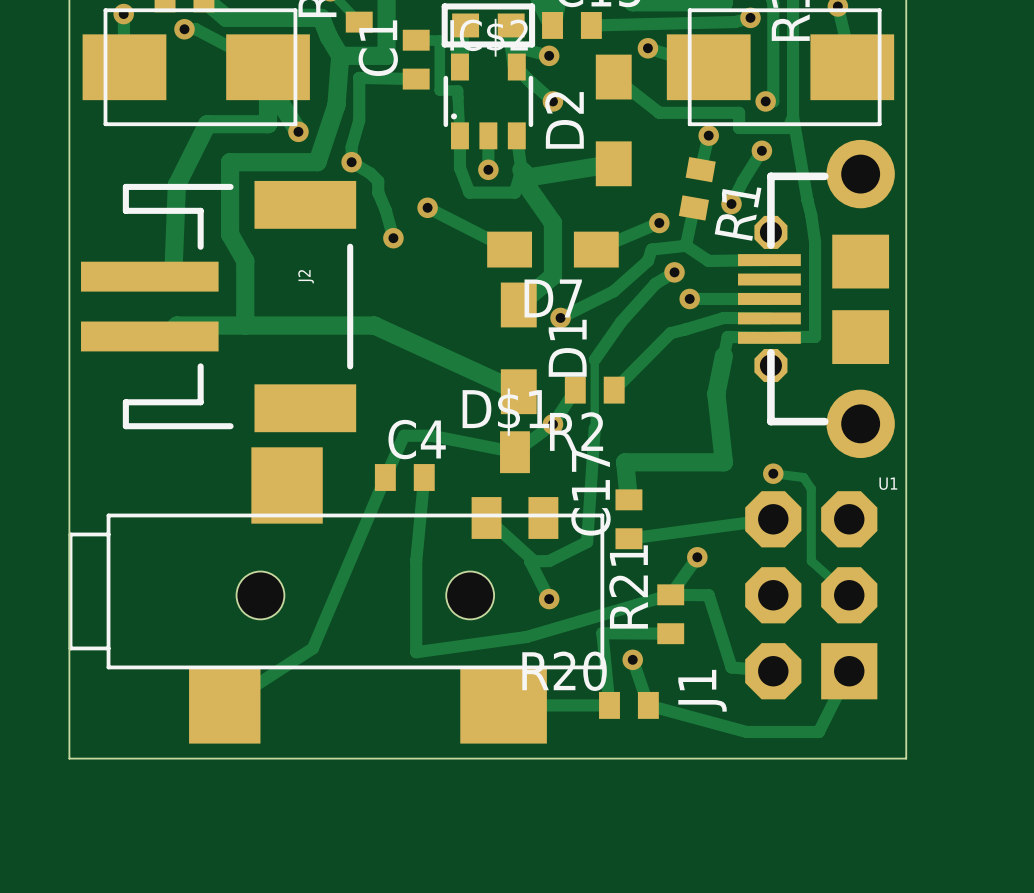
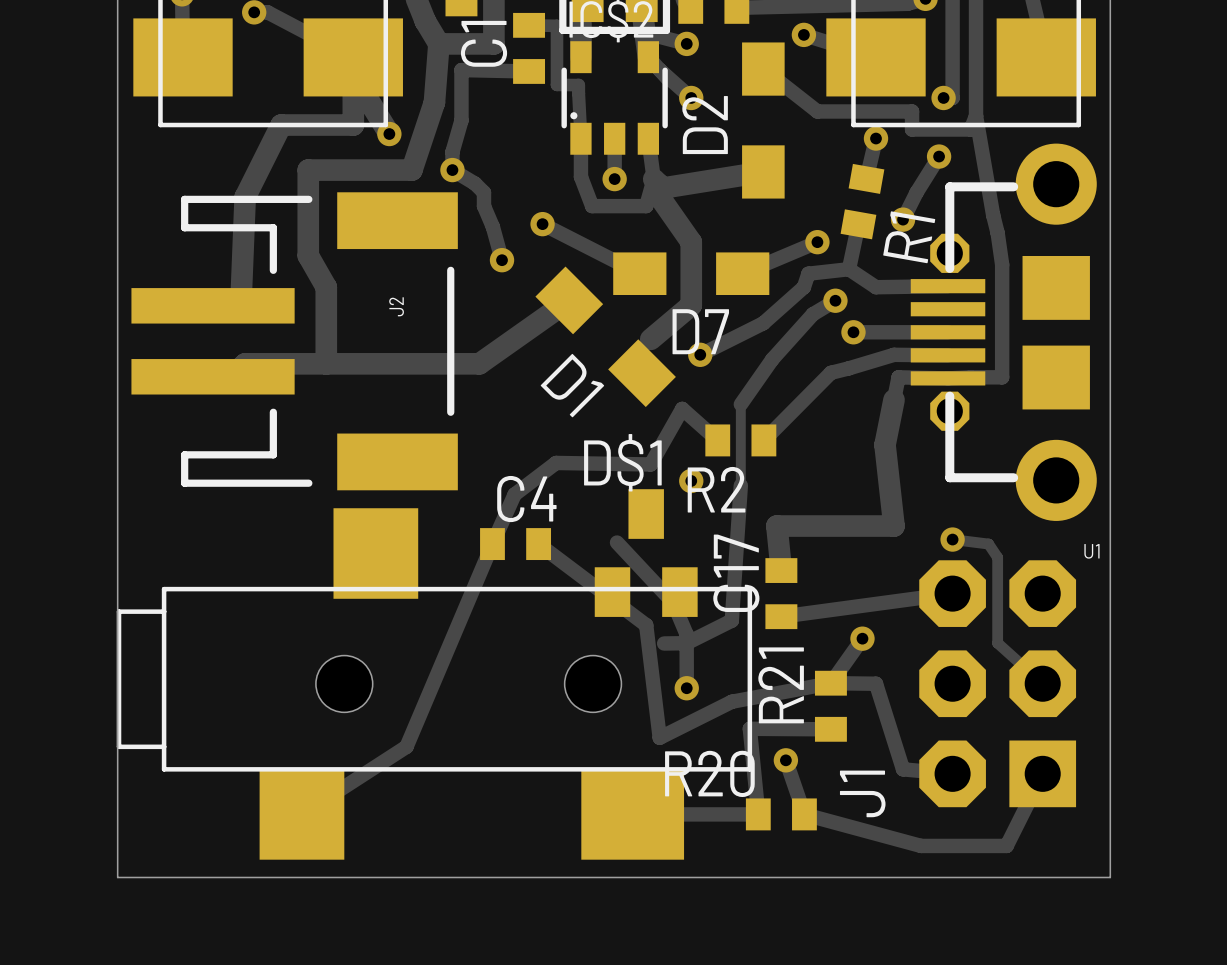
track: (374, 325) (518, 391) -> (479, 363) (569, 300)
D1 rotation: 0° (518, 348) -> 45° counterclockwise (605, 336)
D1 name position: D1 (567, 348) -> D1 (572, 385)
track: (575, 390) (552, 424) (514, 452) (431, 435) (404, 435) -> (717, 440) (682, 408) (650, 464) (556, 462) (514, 494)
track: (424, 477) (416, 561) (416, 652) (526, 637) (670, 594) -> (538, 544) (646, 625) (659, 737) (731, 701) (830, 683)
track: (486, 518) (533, 561) (530, 561) (549, 599) -> (617, 542) (673, 602) (686, 634) (686, 688)

